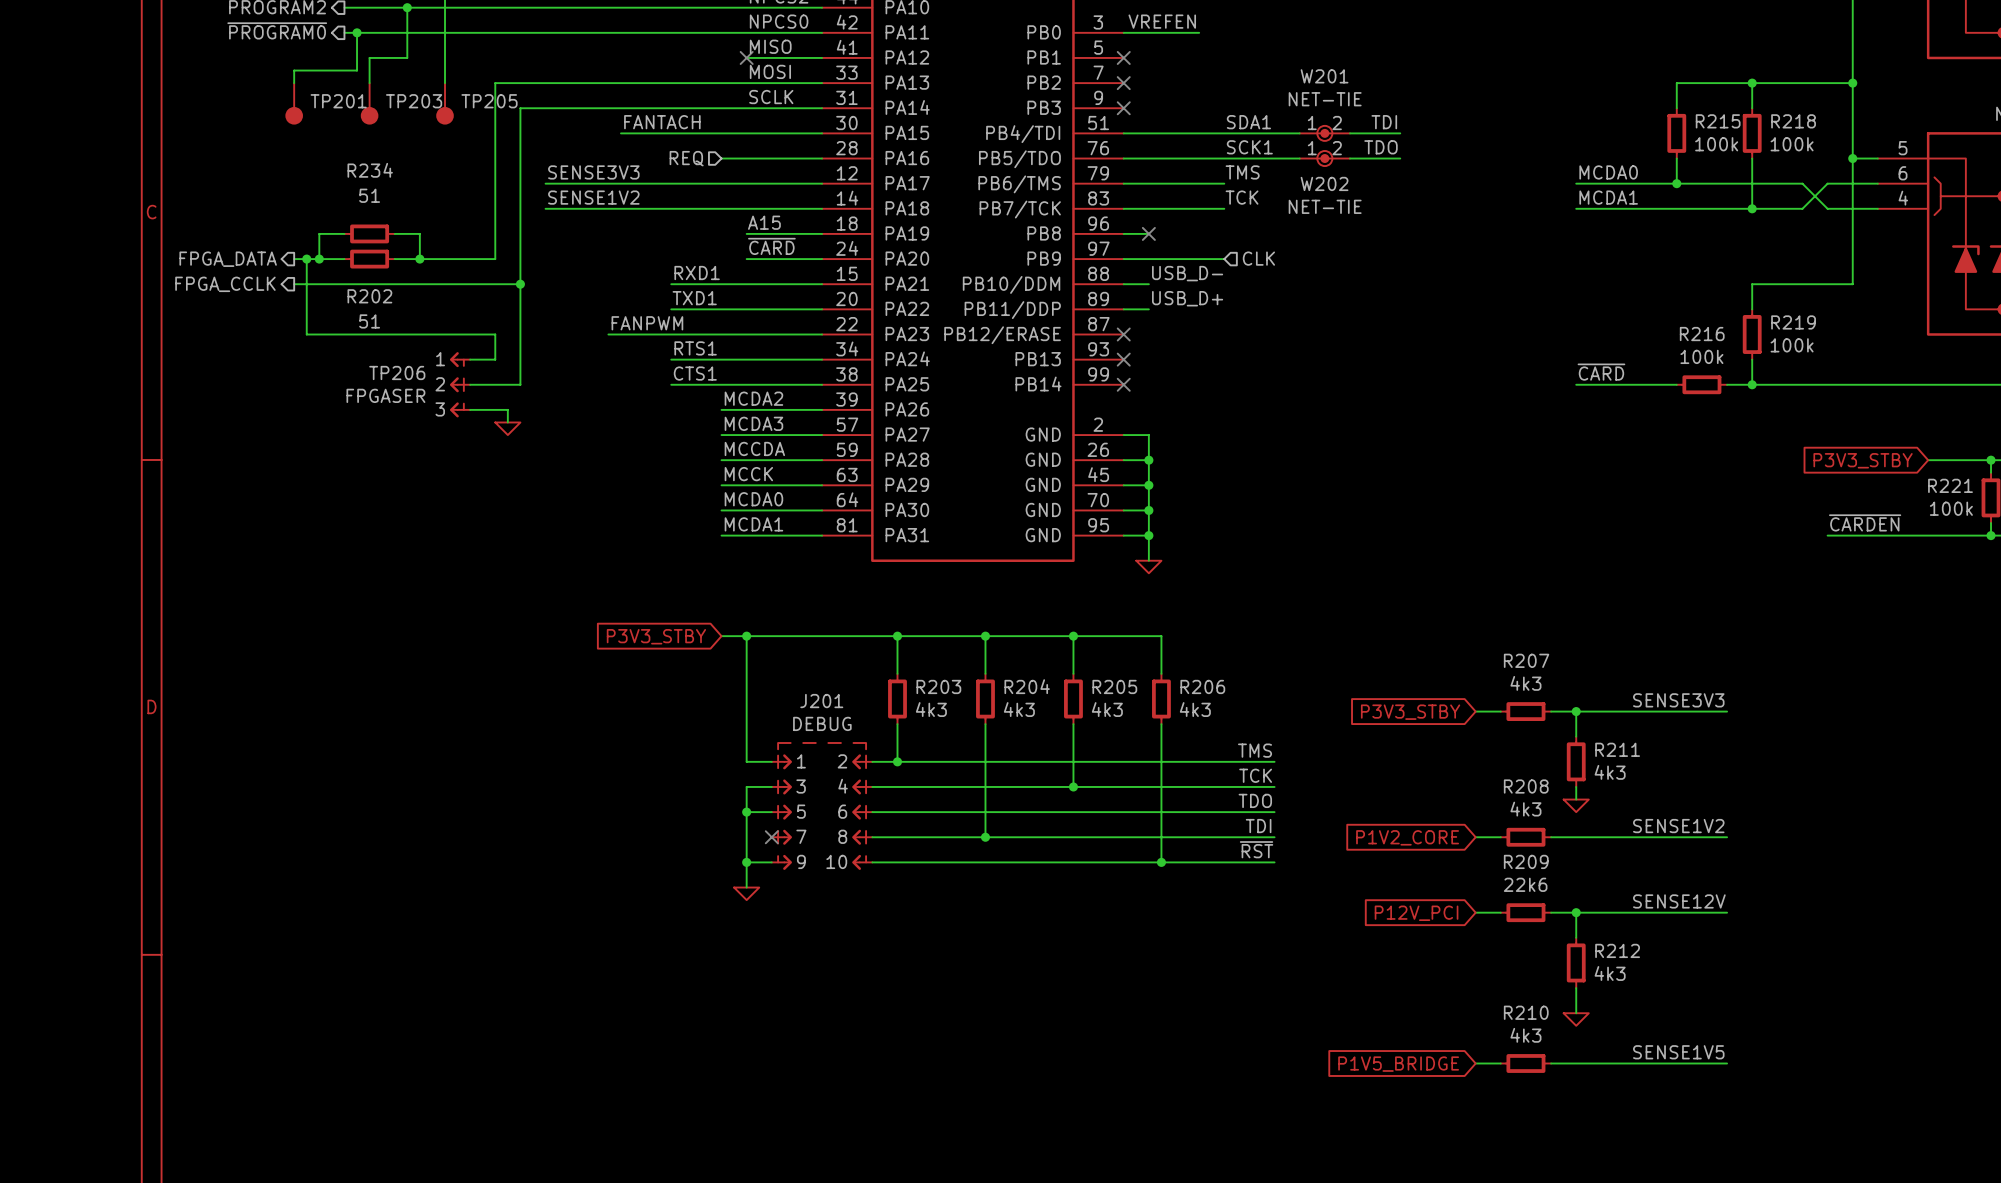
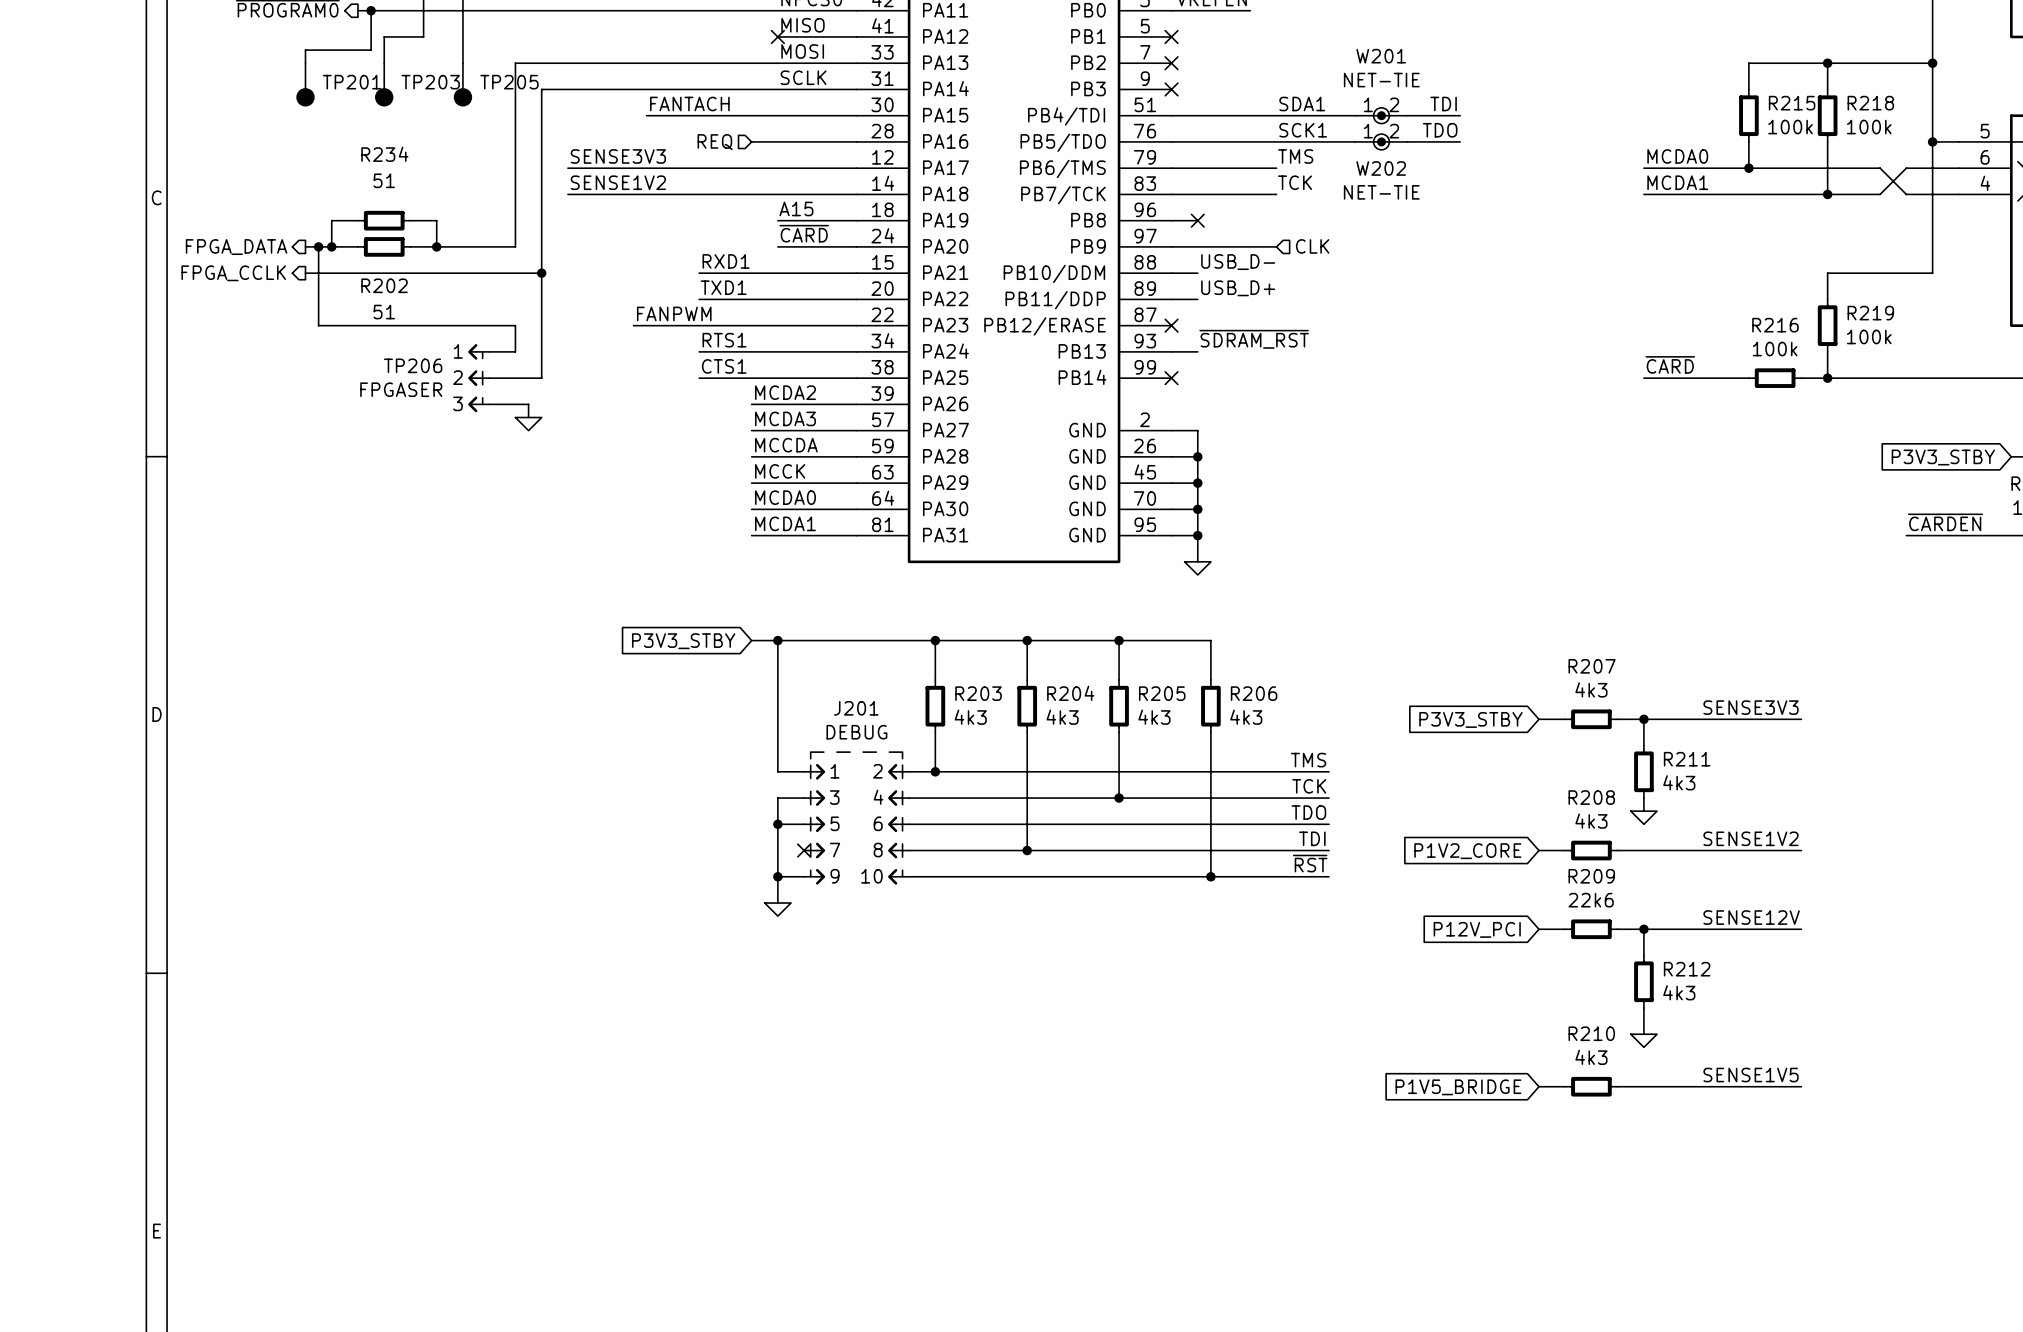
label: none -> ~{SDRAM_RST} (1254, 339)
wire: none -> (1171, 351) (1197, 351)
no-connect mark: (1123, 359) -> none

